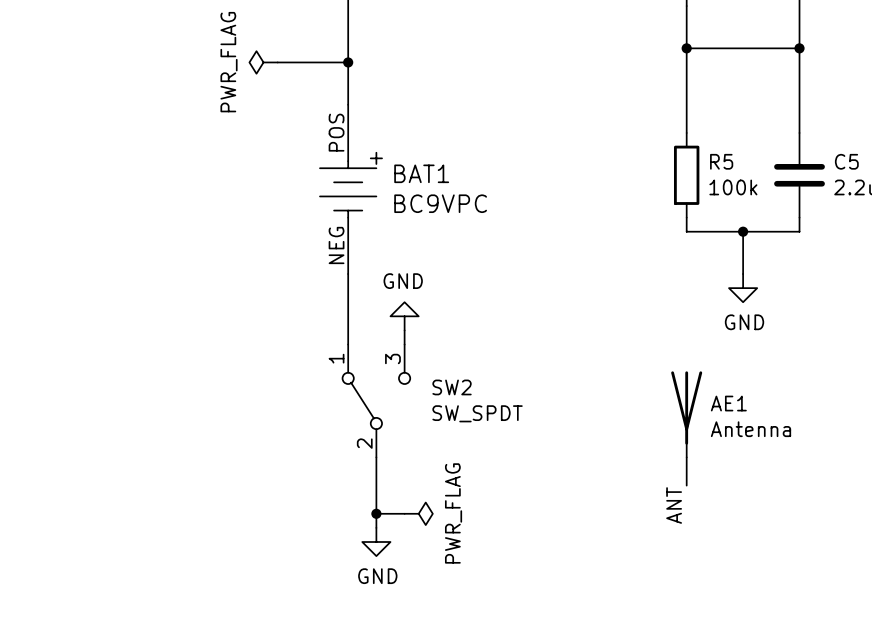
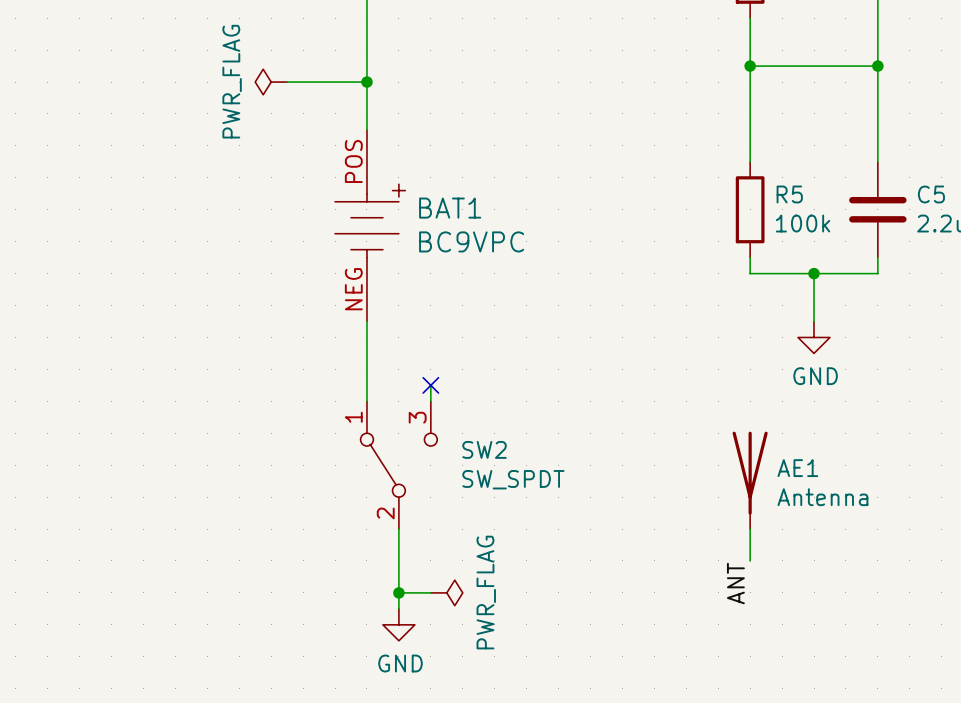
power symbol: GND (404, 316) -> none
no-connect mark: none -> (430, 385)

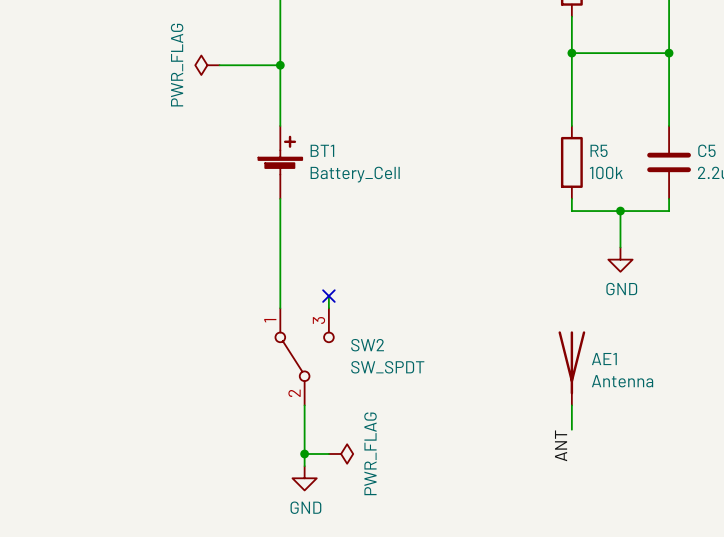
BT1: none -> Battery_Cell (280, 162)
BAT1: BC9VPC (370, 225) -> none

